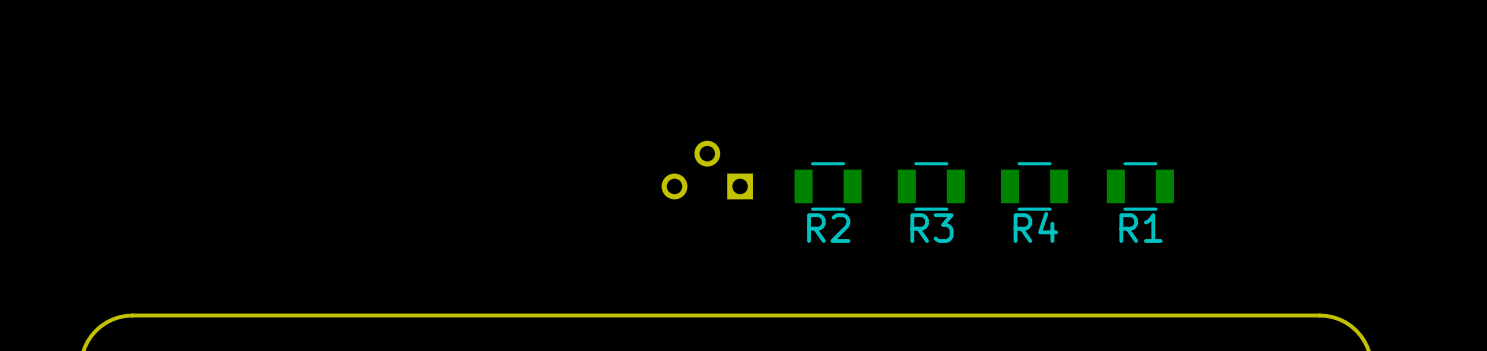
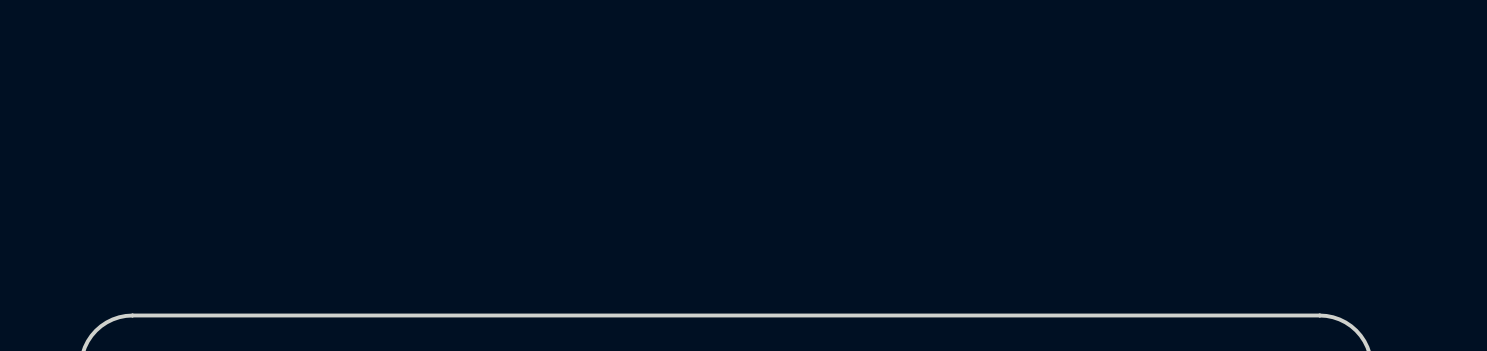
part: (707, 170) -> none
R2: (828, 186) -> none
R3: (931, 186) -> none
R4: (1034, 186) -> none
R1: (1140, 186) -> none

